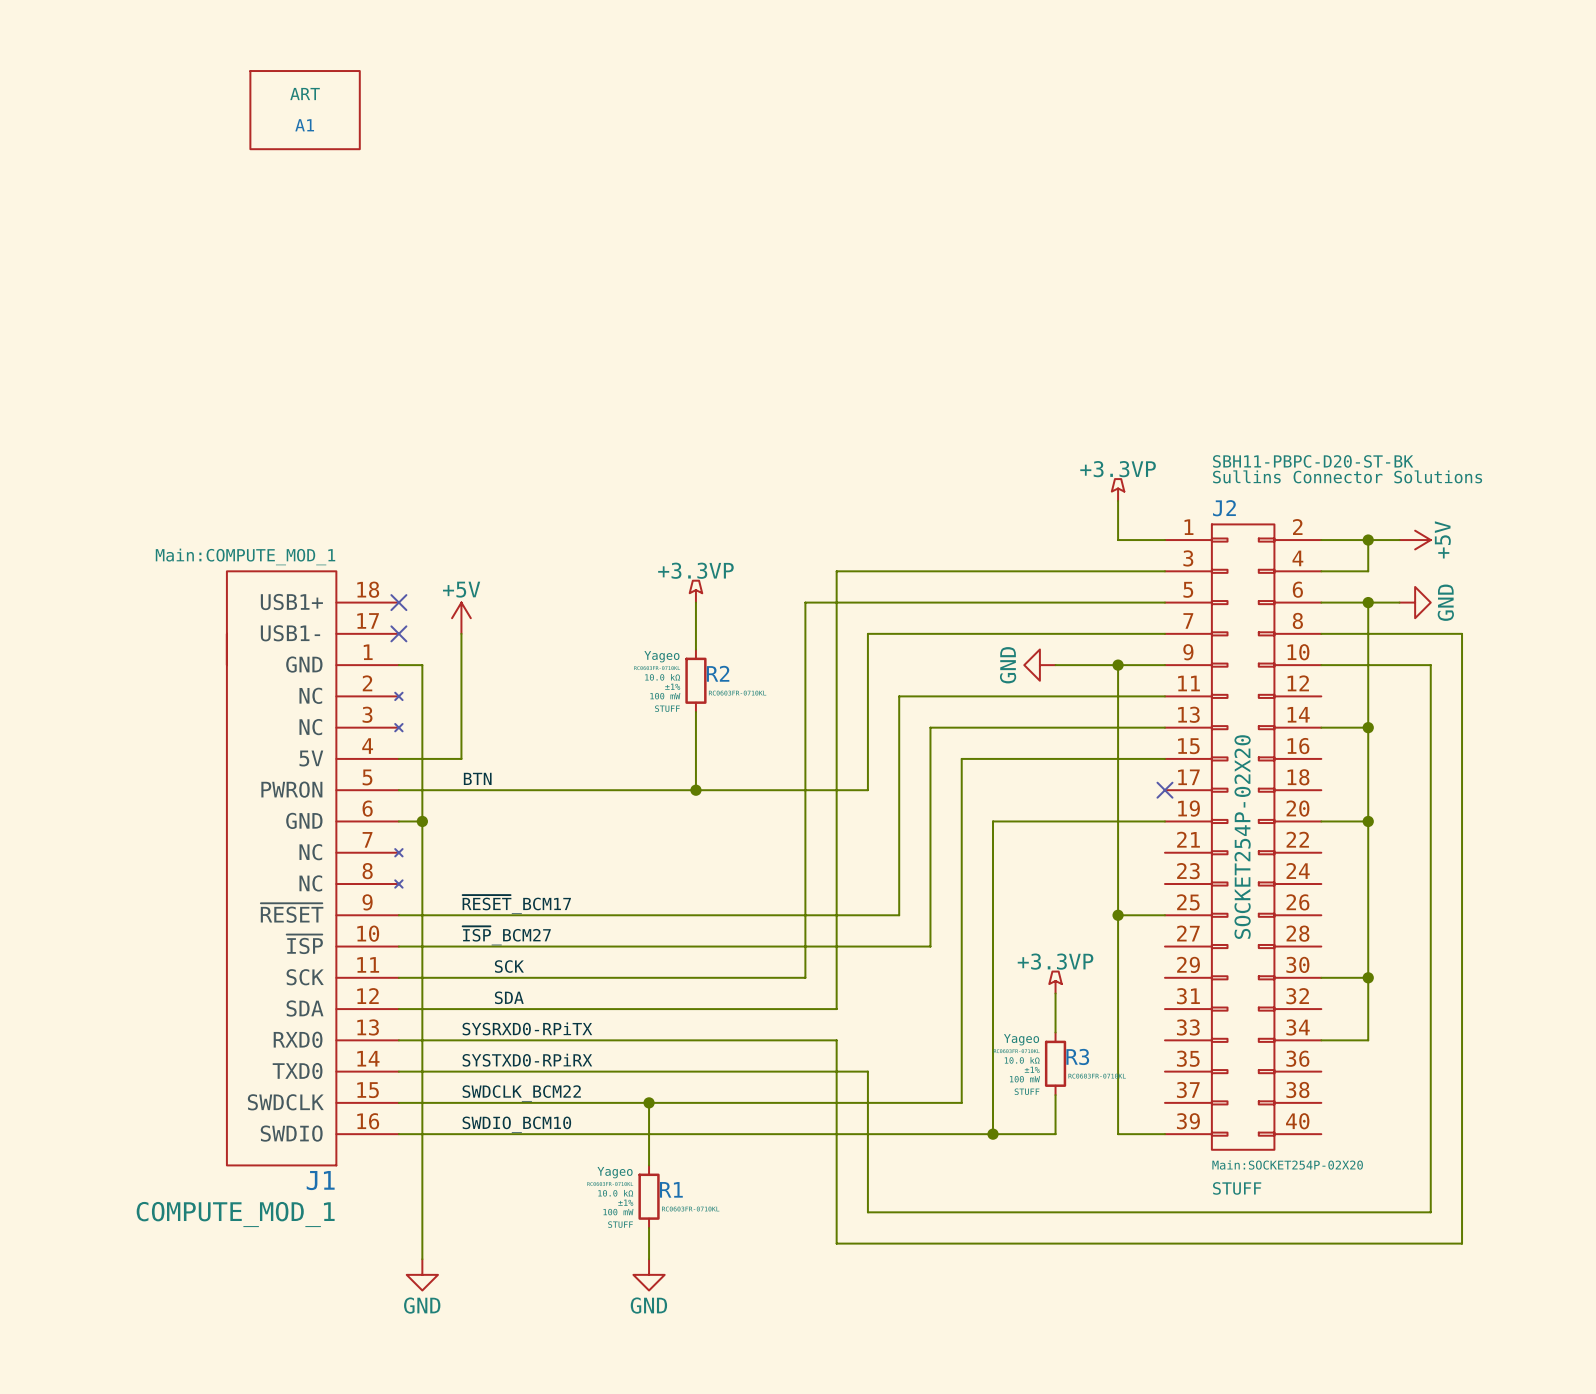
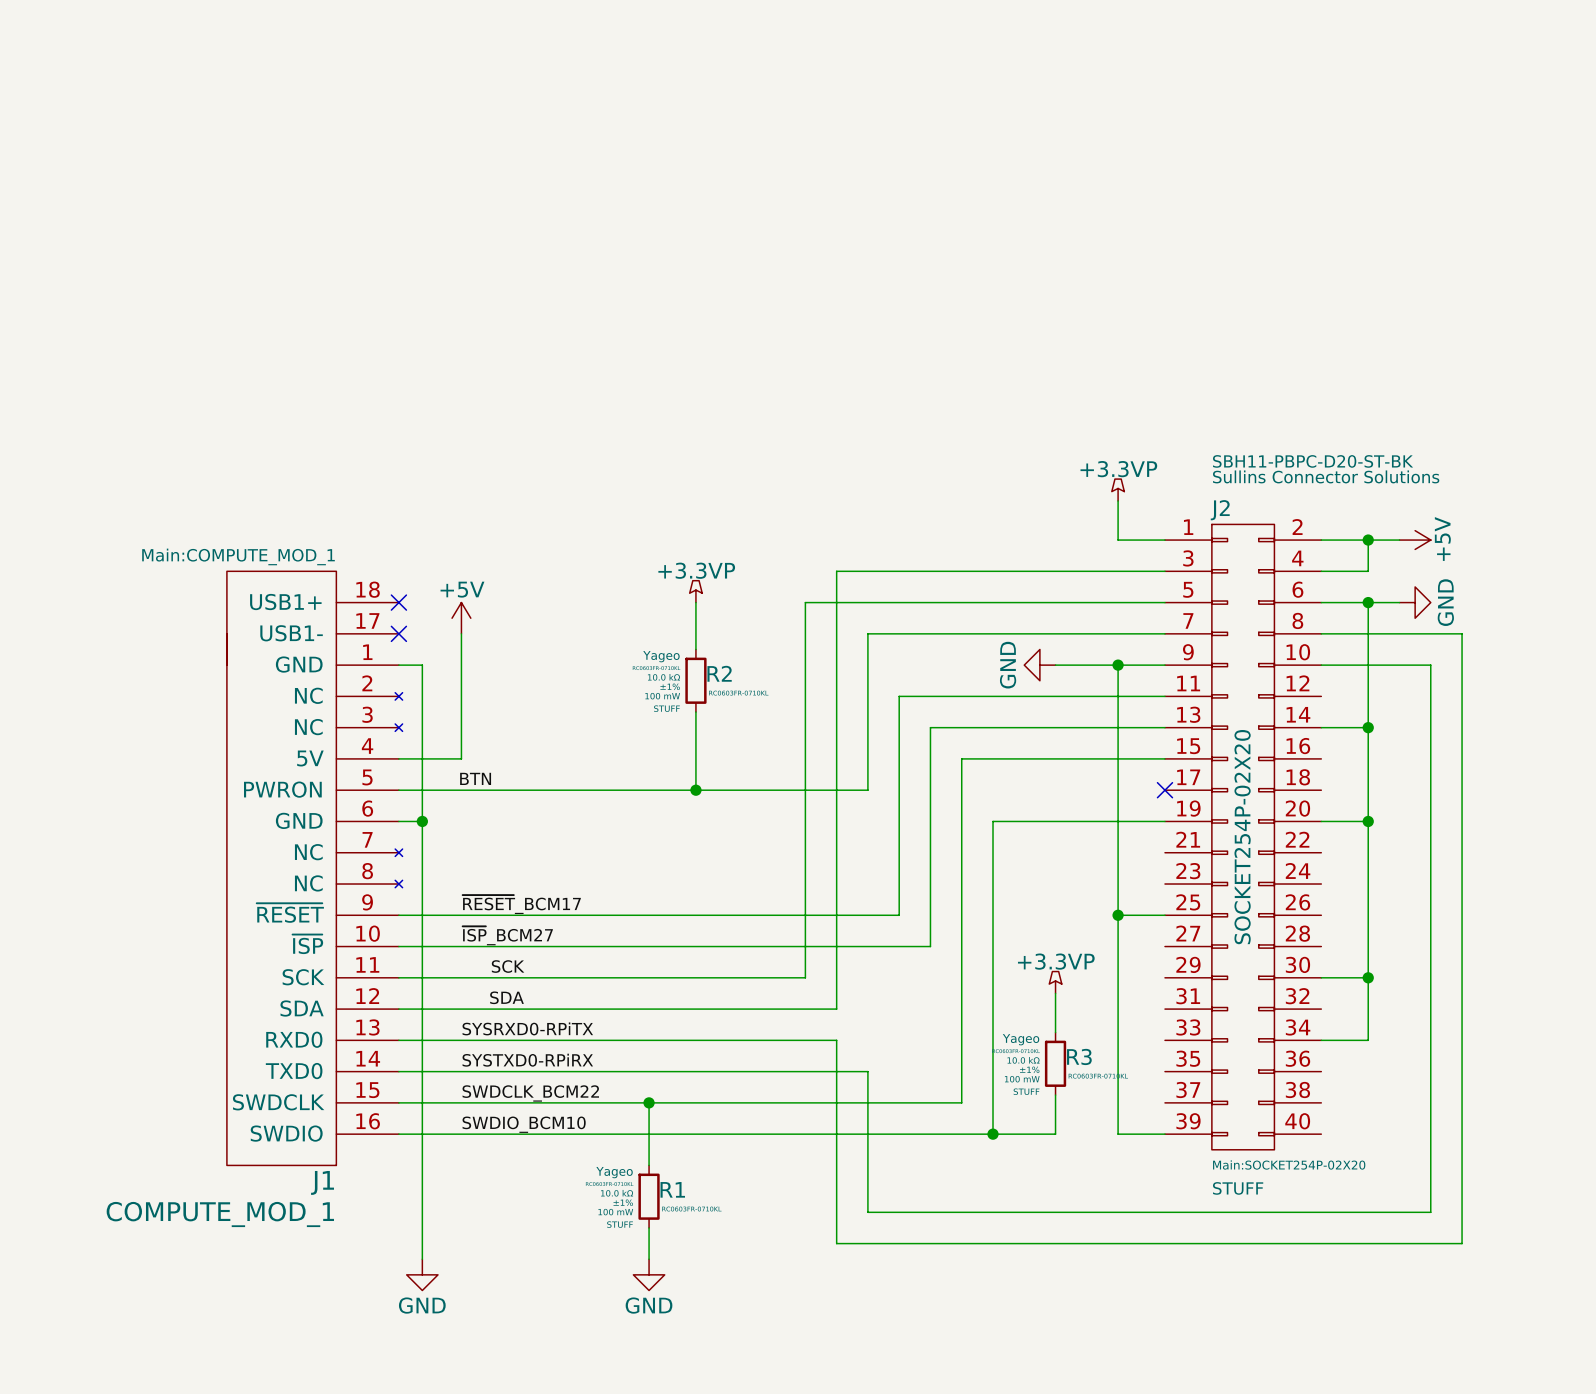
A1: ART (305, 110) -> none

